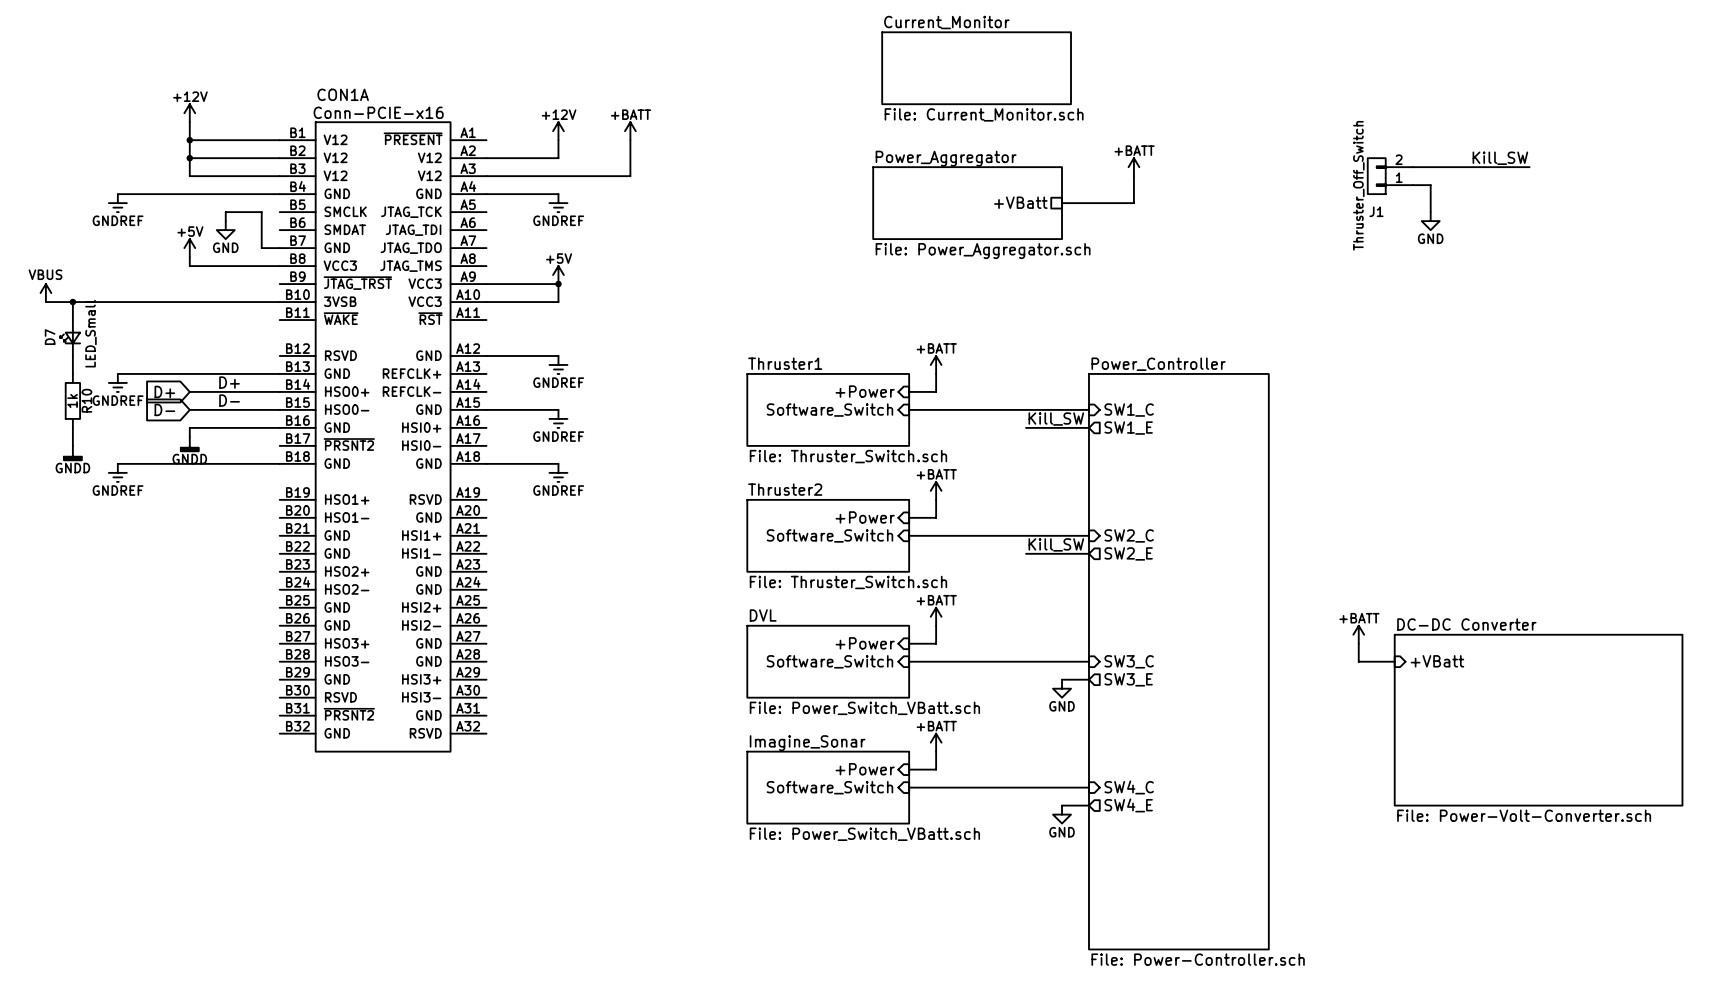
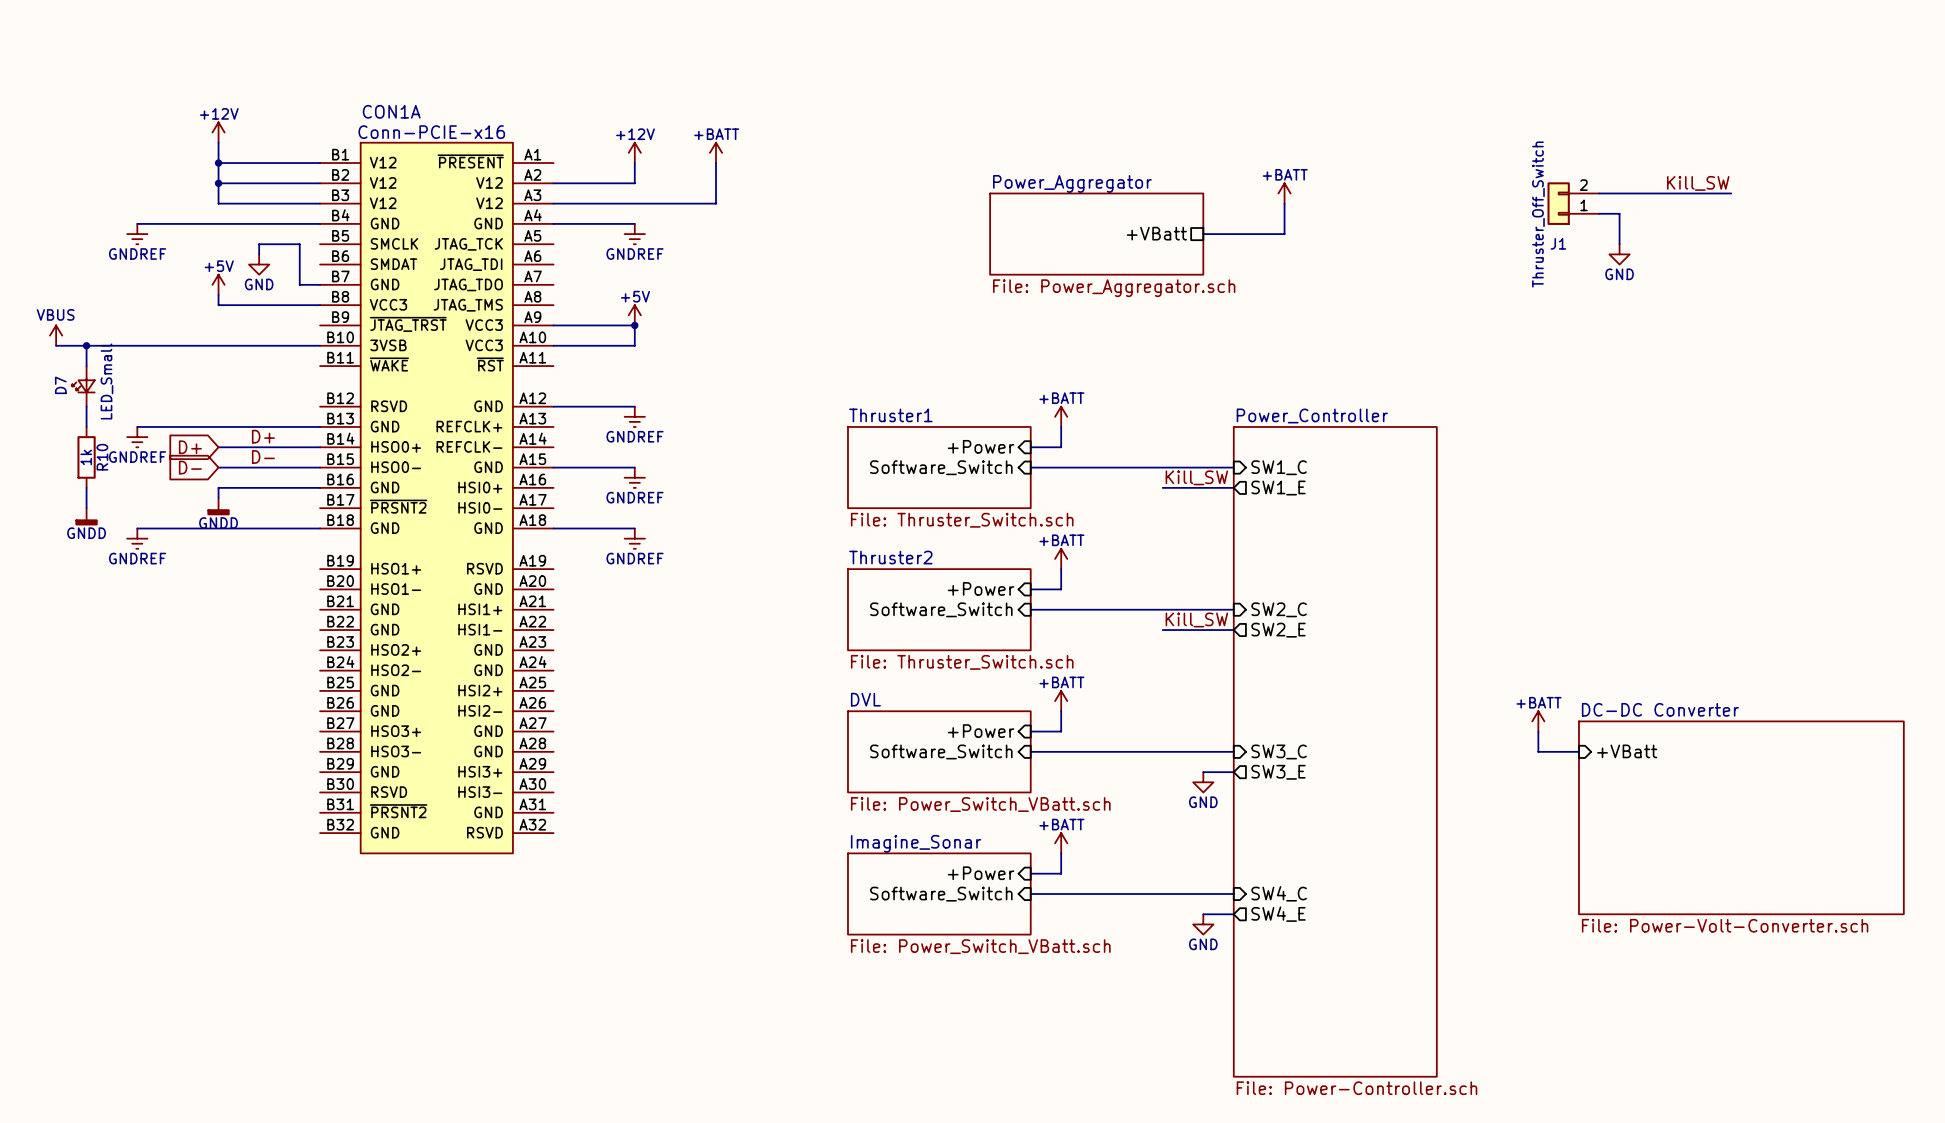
sheet Current_Monitor: File: Current_Monitor.sch (976, 68) -> none

